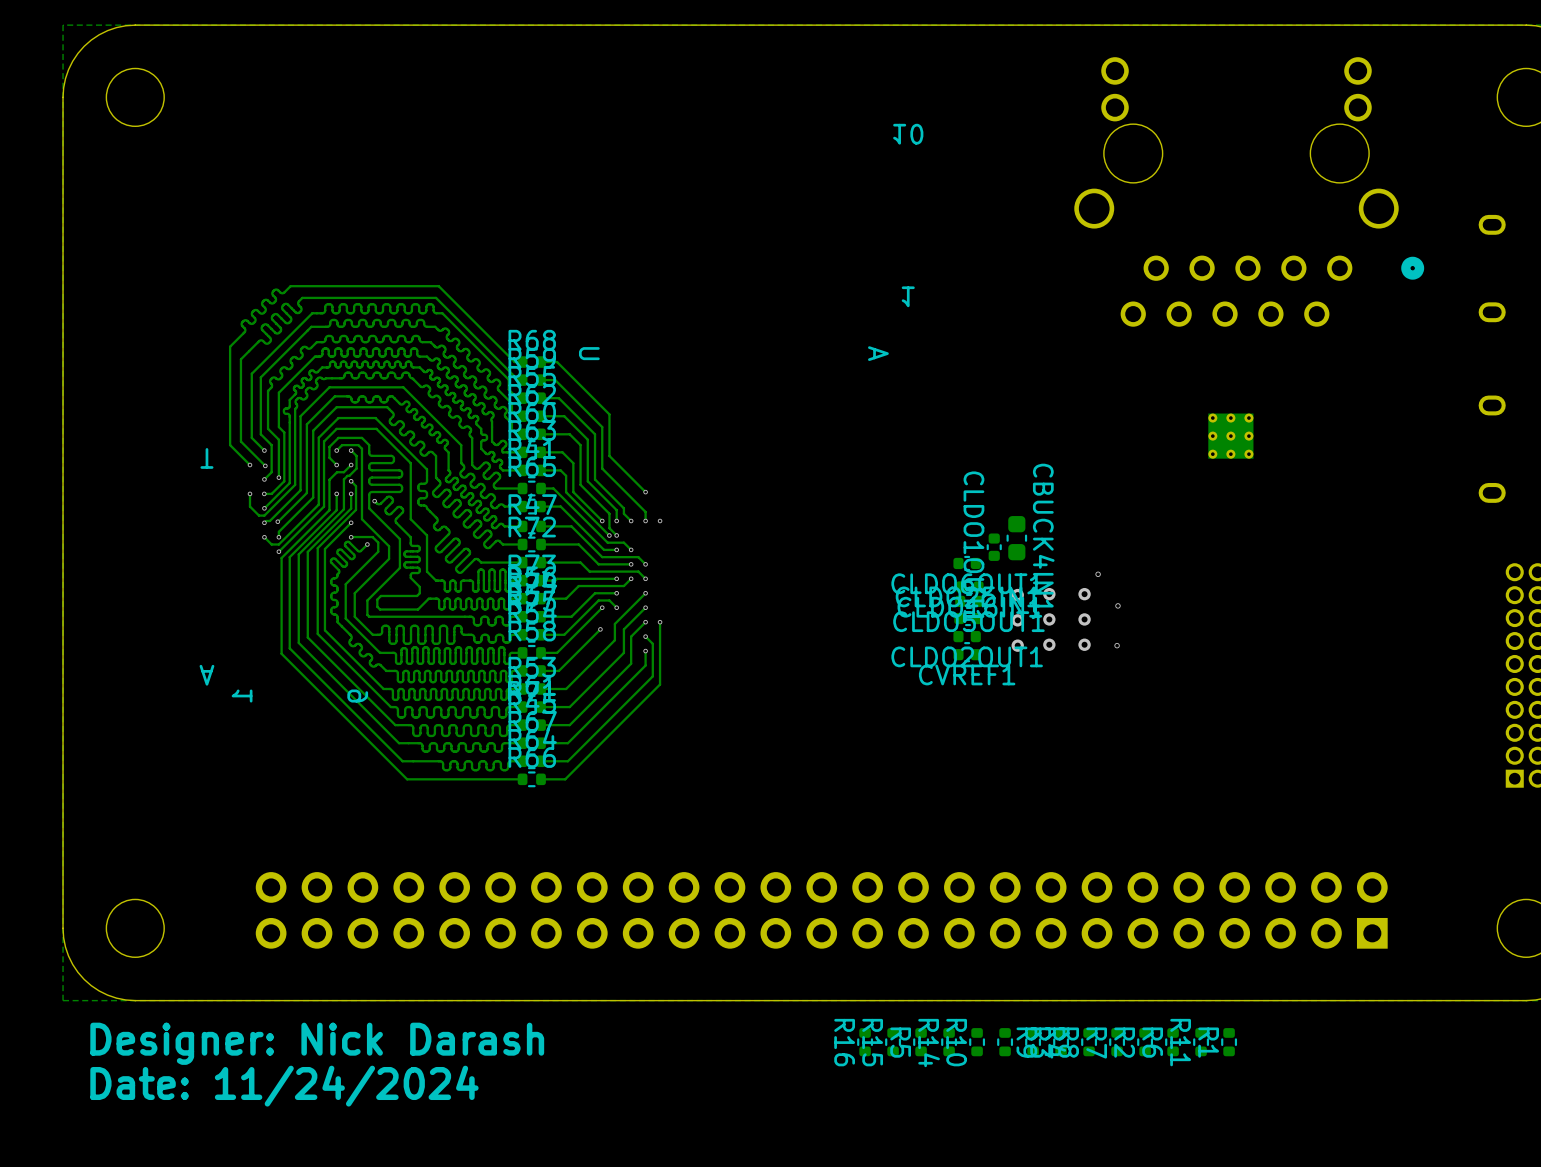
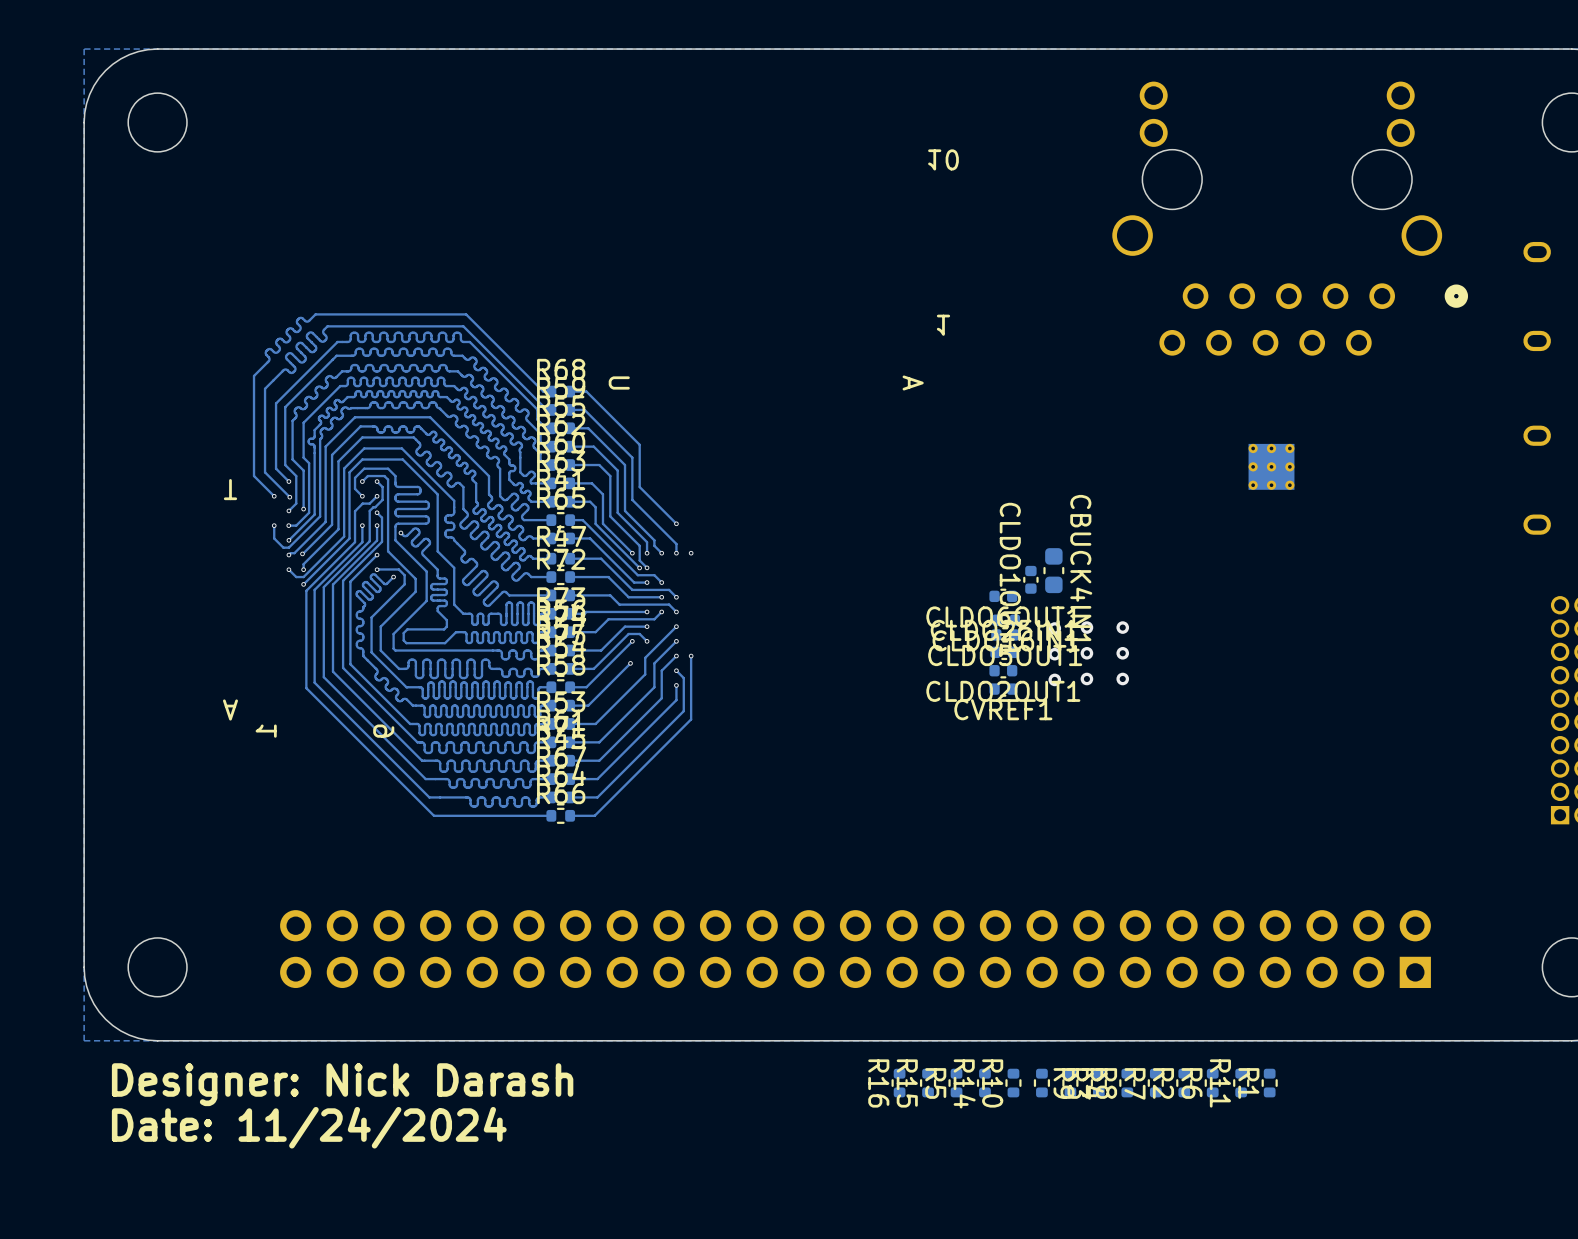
via: (1098, 574) -> none
via: (1117, 605) -> none
via: (1117, 645) -> none

